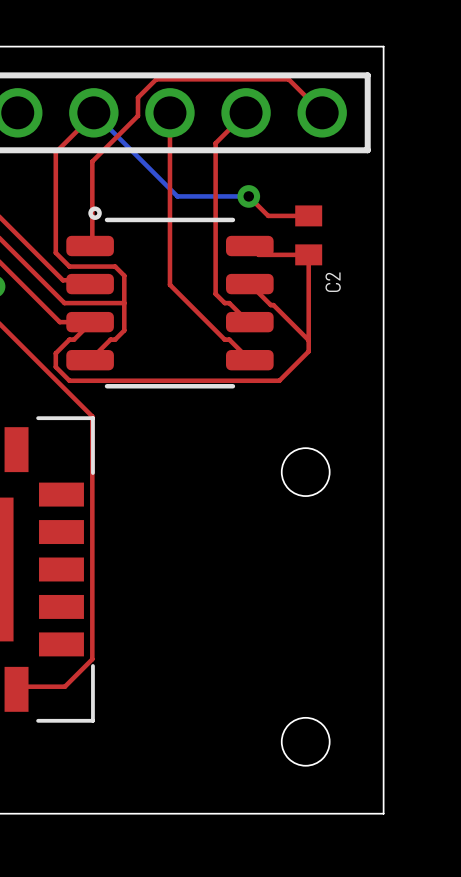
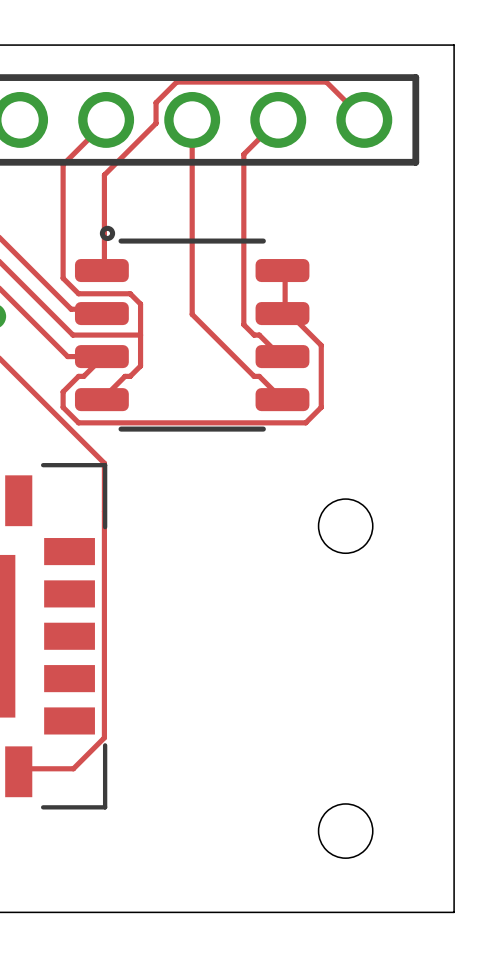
board edge: (383, 46) (383, 813) -> (433, 45) (454, 45) (454, 912) (433, 912)
bottom track: (93, 112) (177, 196) (248, 196) -> none
top track: (248, 196) (268, 215) (308, 215) -> none
via: (248, 196) -> none
C2: (308, 235) -> none
top track: (249, 246) (258, 254) (308, 254) (308, 351) (279, 380) (270, 380) -> (282, 270) (285, 273) (285, 309) (321, 345) (321, 407) (305, 422)
top track: (249, 284) (308, 340) -> none

